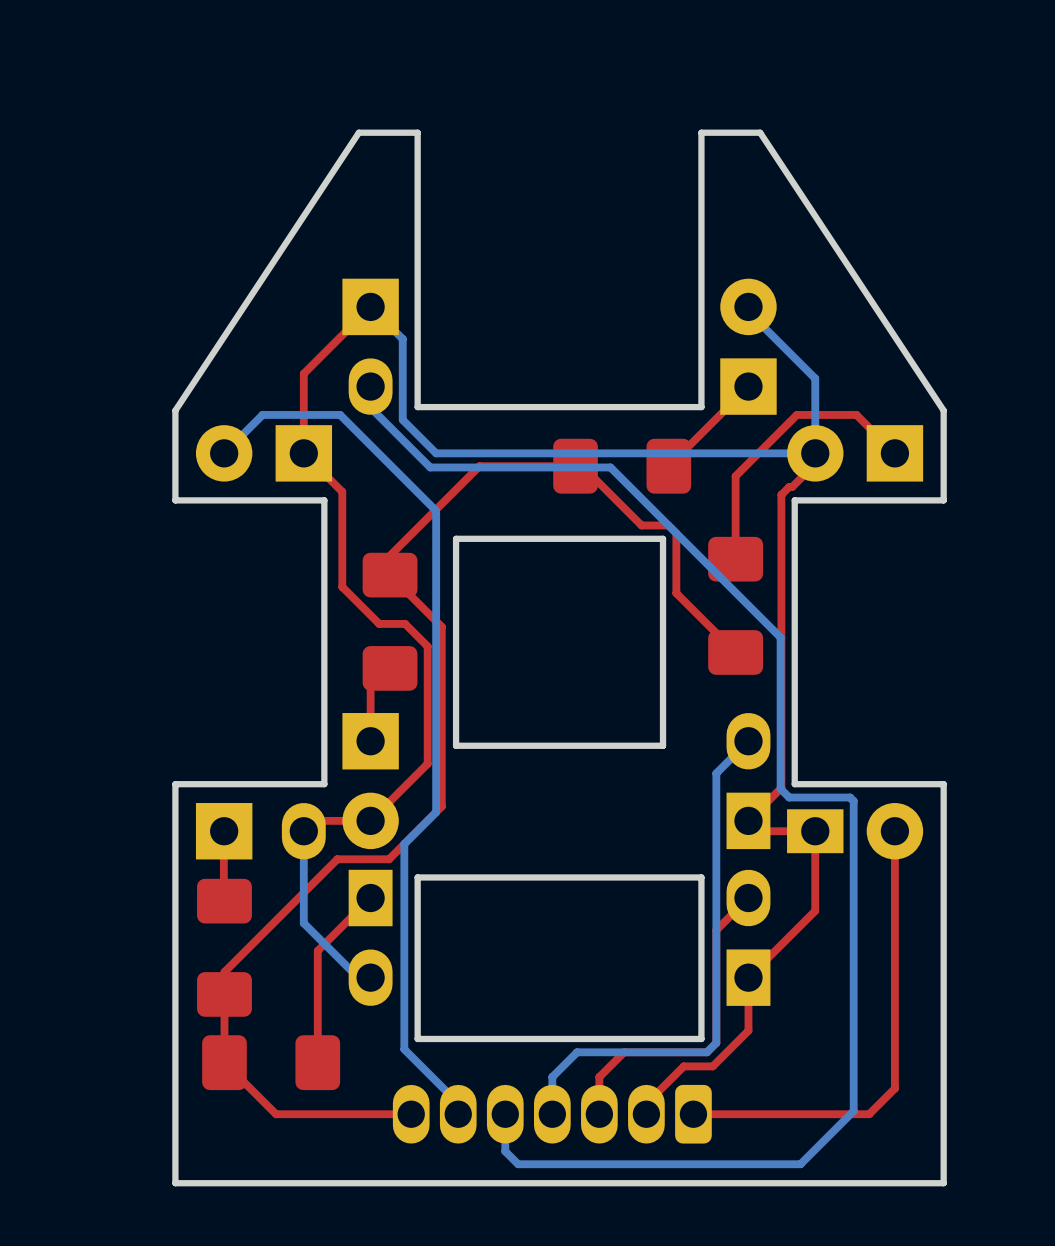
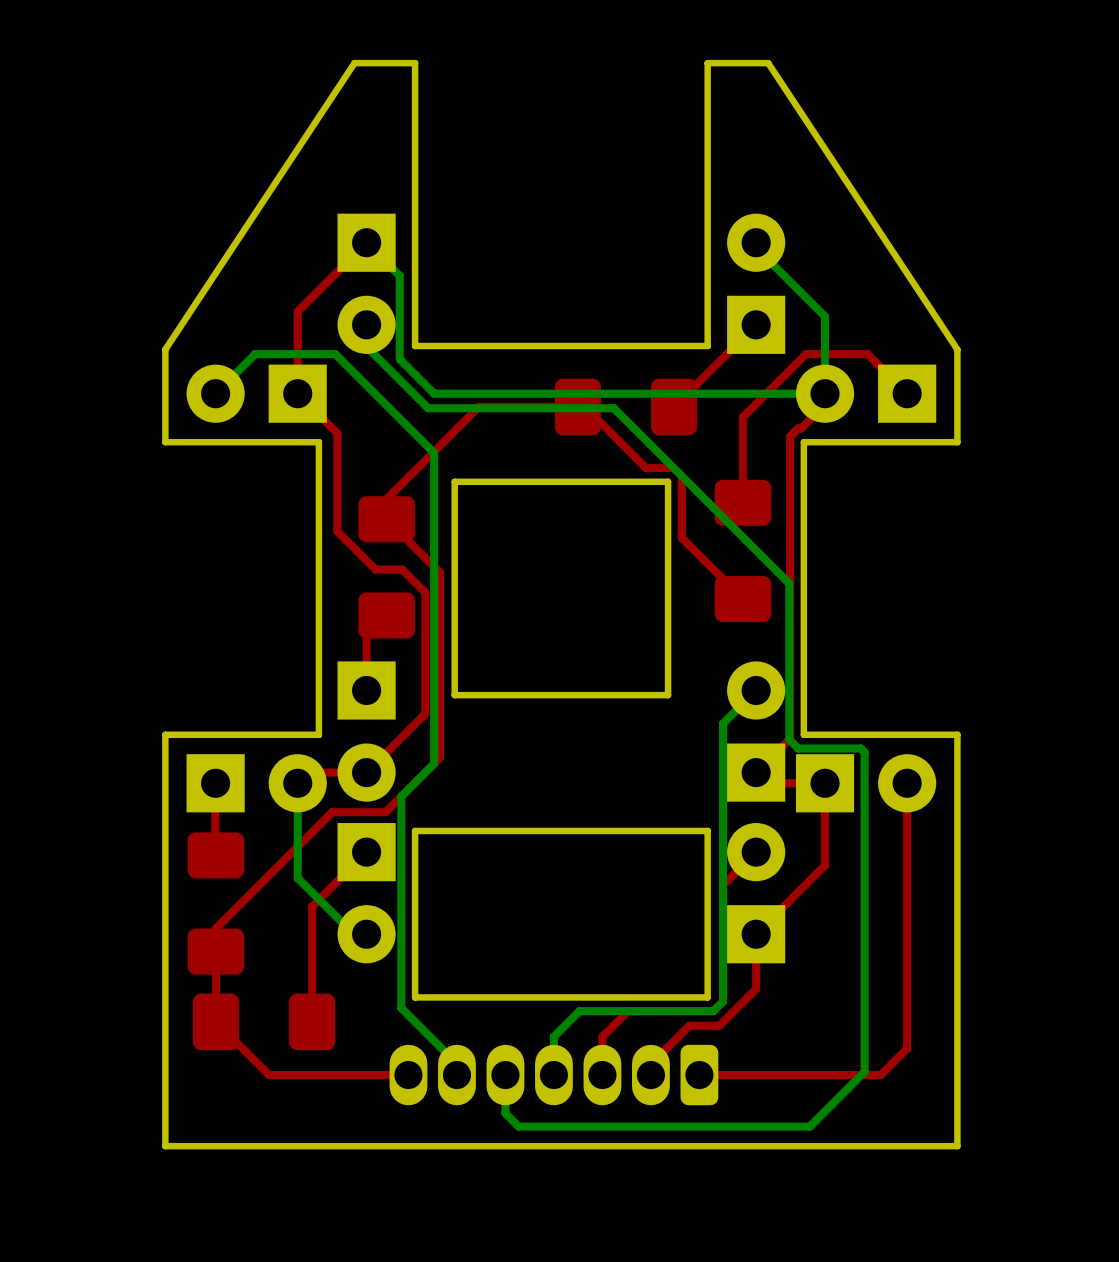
part footprint: [342, 278, 399, 415] -> [337, 213, 396, 354]
part footprint: [726, 713, 771, 850] -> [727, 661, 786, 802]
part footprint: [195, 803, 326, 860] -> [186, 754, 327, 813]
part footprint: [787, 803, 924, 860] -> [795, 754, 937, 813]
part footprint: [348, 869, 393, 1006] -> [337, 823, 396, 964]
part footprint: [726, 869, 771, 1006] -> [727, 823, 786, 964]

